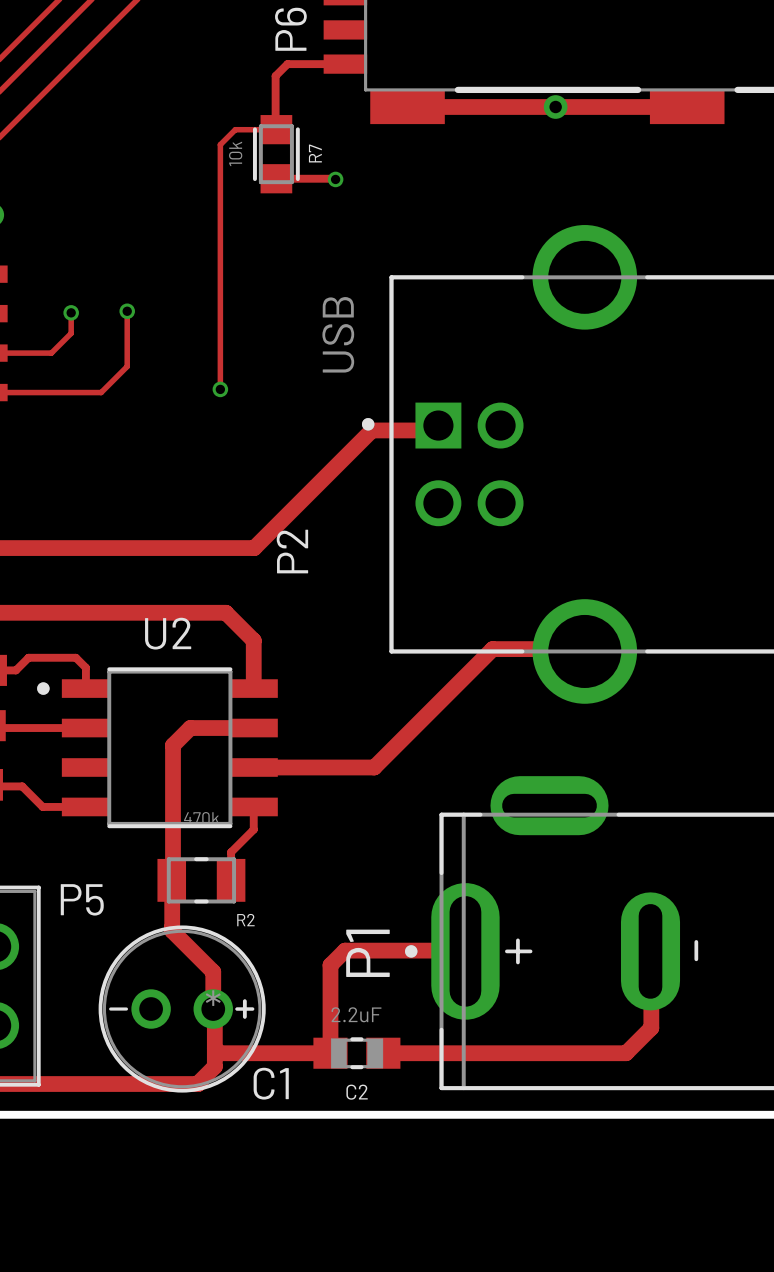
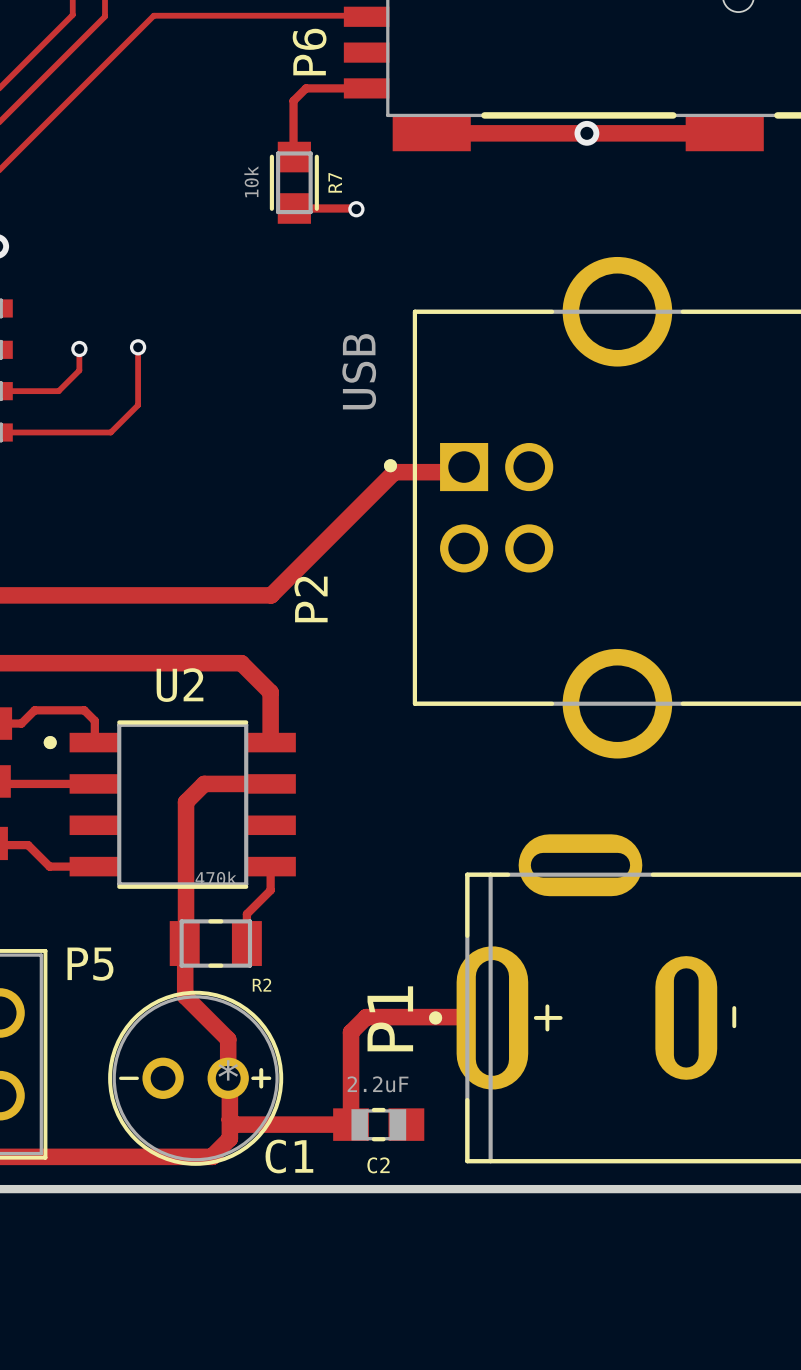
track: (276, 129) (235, 129) (220, 144) (220, 389) -> none
via: (220, 389) -> none
track: (592, 649) (492, 649) (374, 767) (253, 767) -> none
track: (651, 960) (651, 1027) (626, 1053) (383, 1053) -> none

